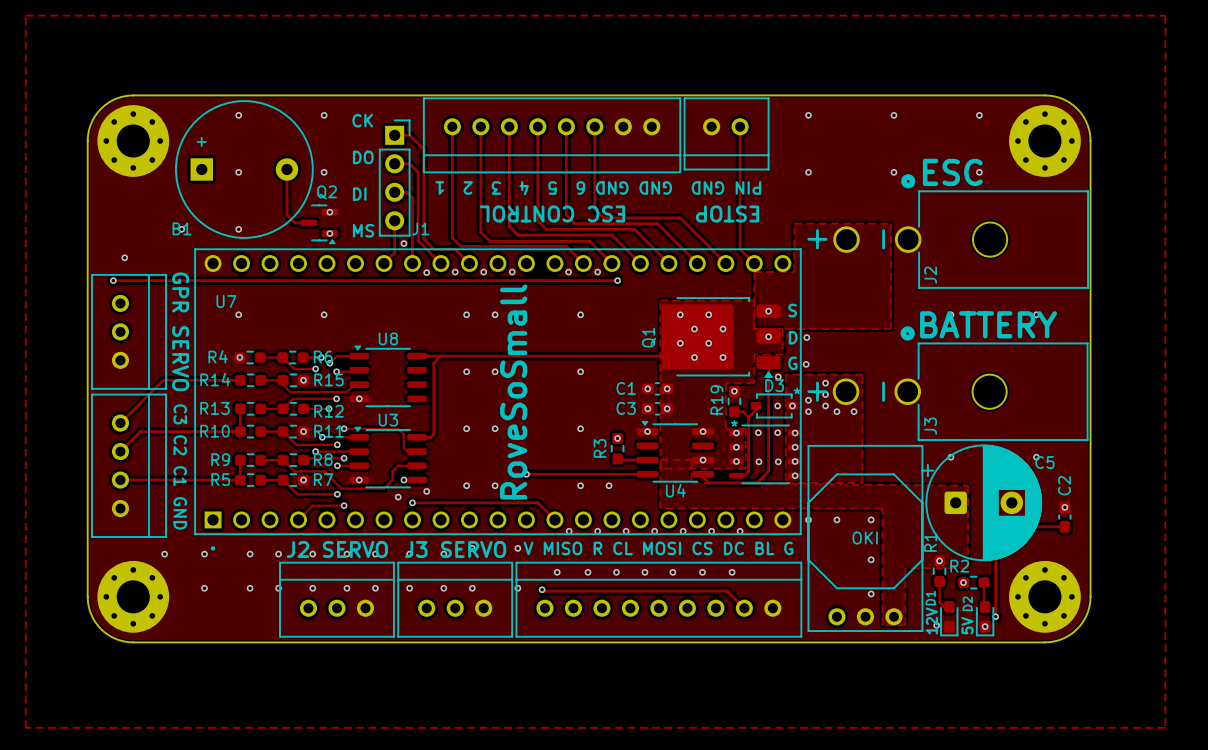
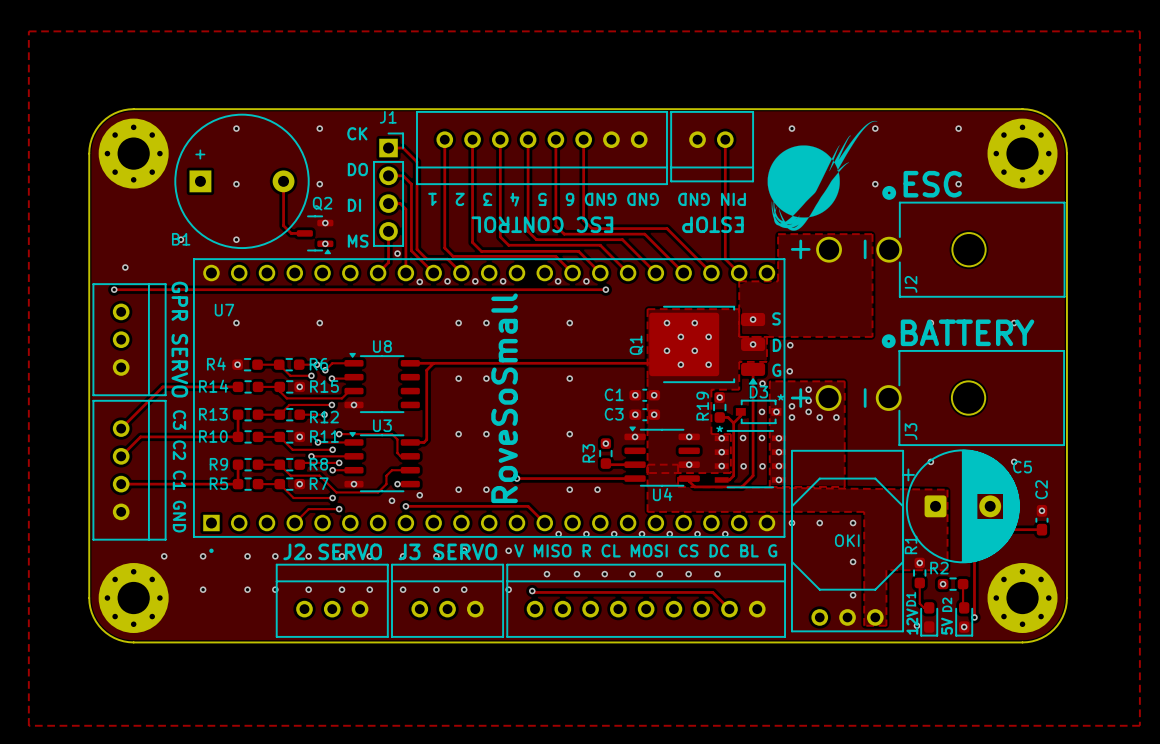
drawing: none -> [767, 120, 878, 231]
J1 name position: J1 (420, 228) -> J1 (388, 117)

